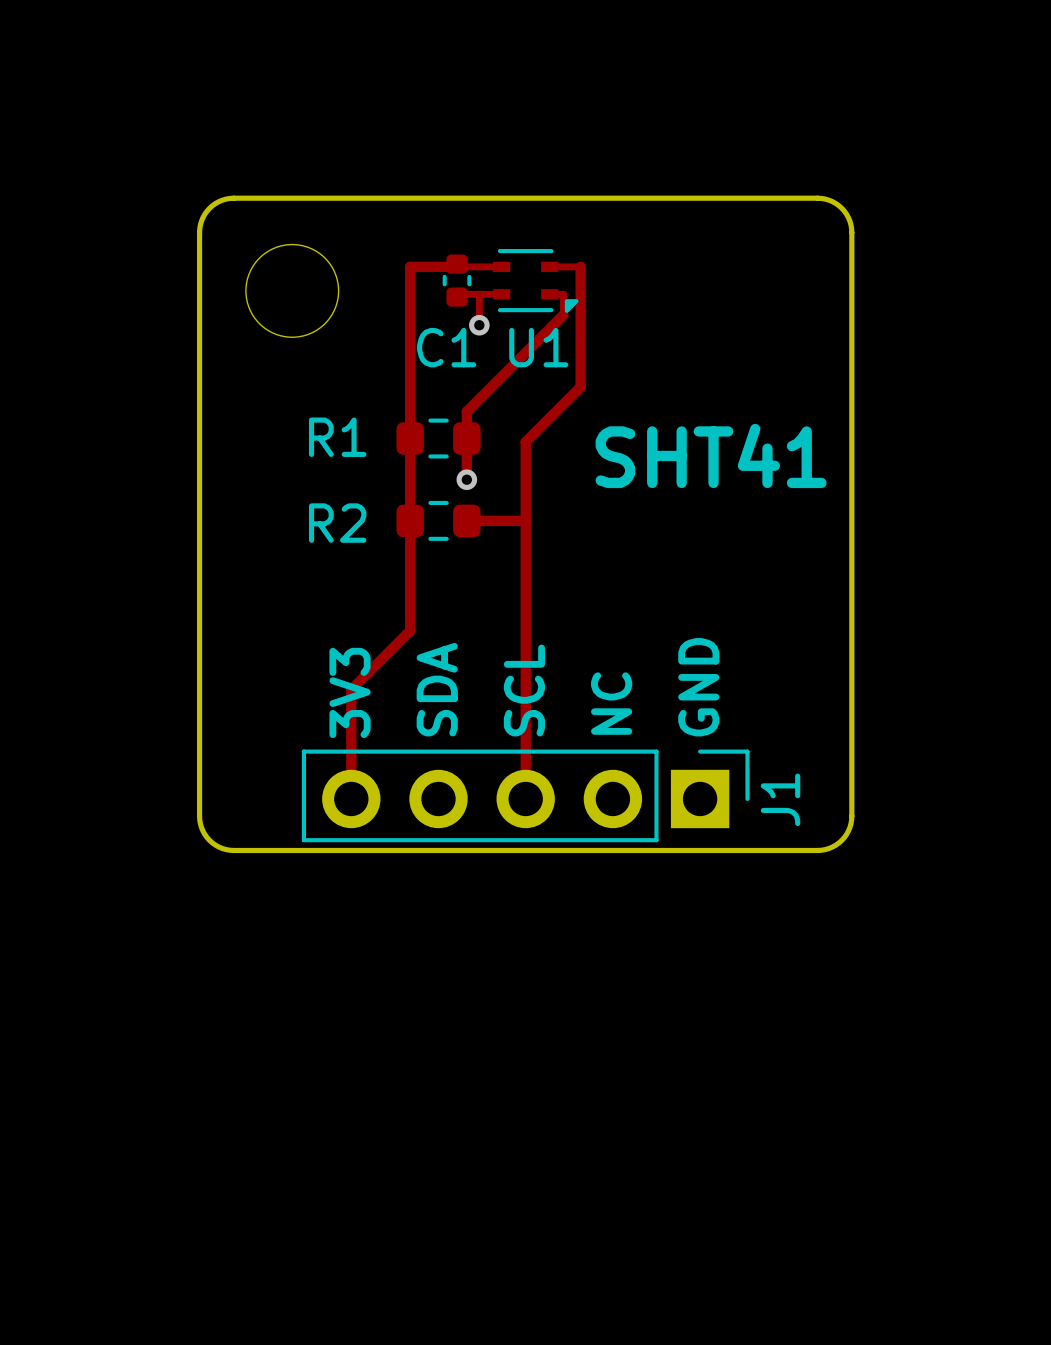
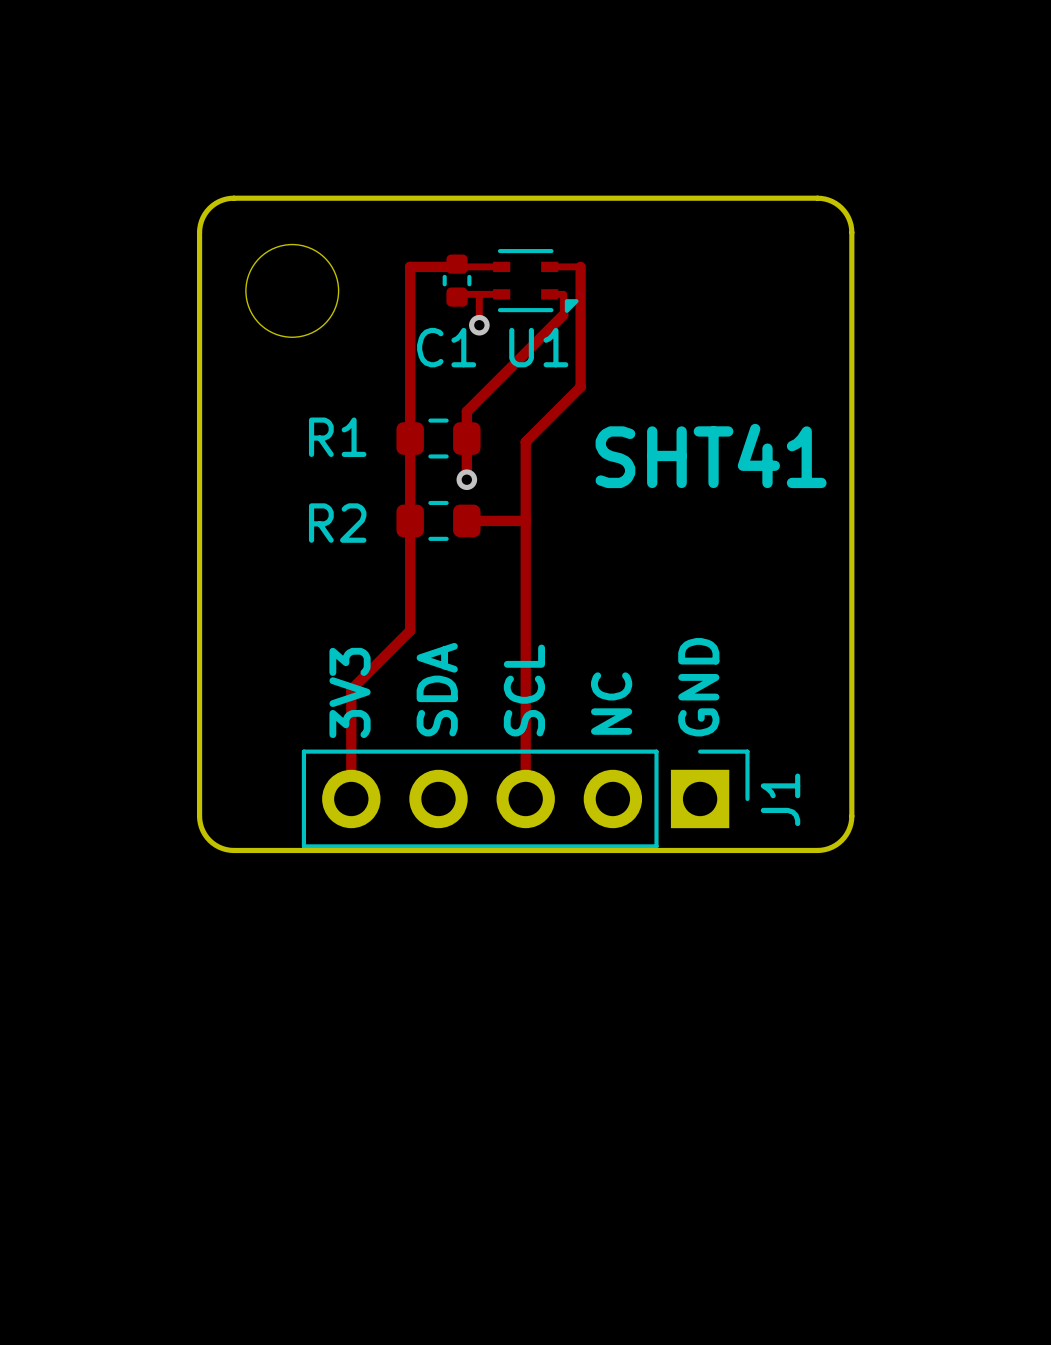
J1 footprint: [301, 749, 750, 843] -> [301, 749, 750, 849]

